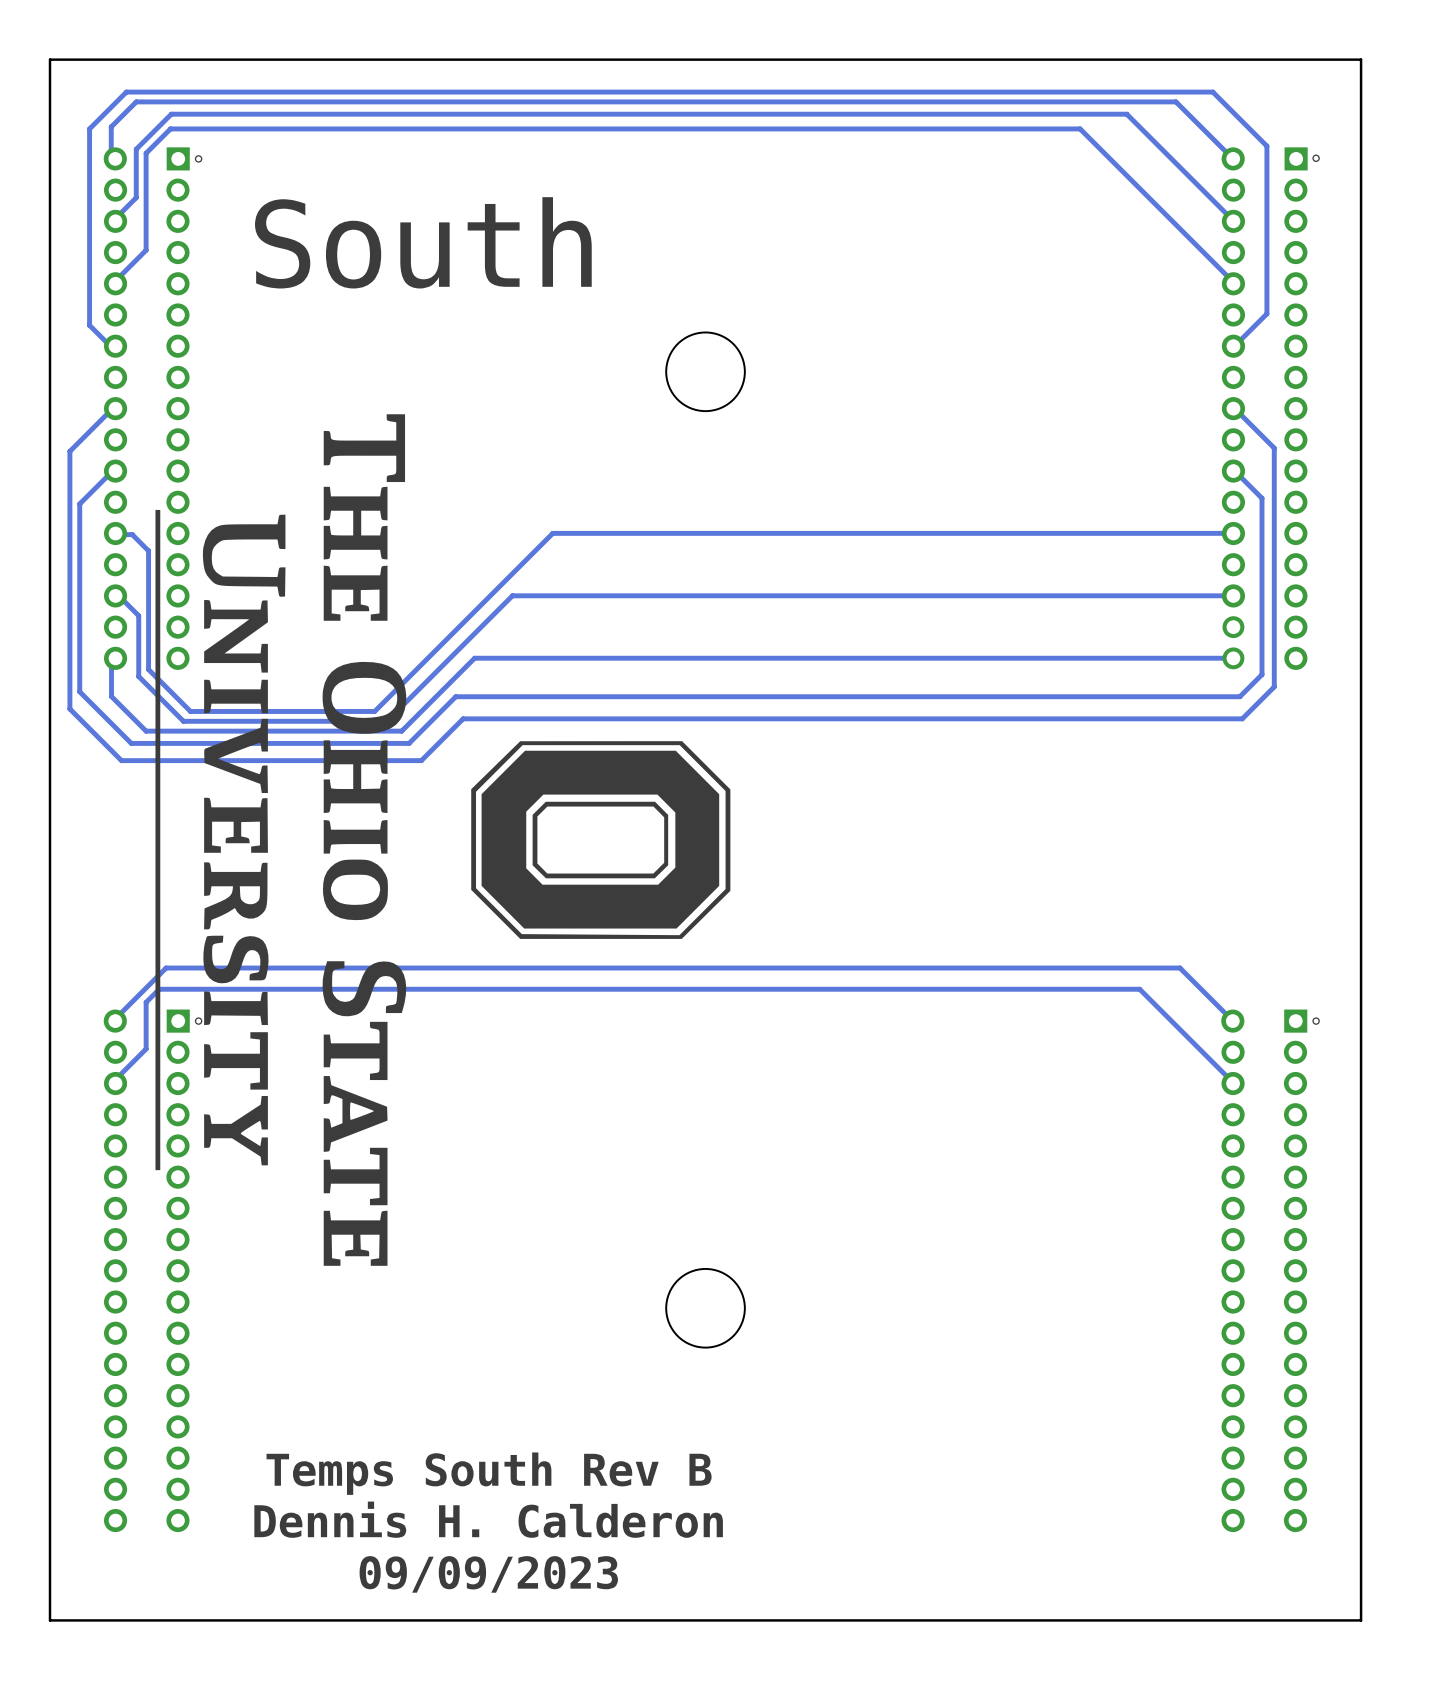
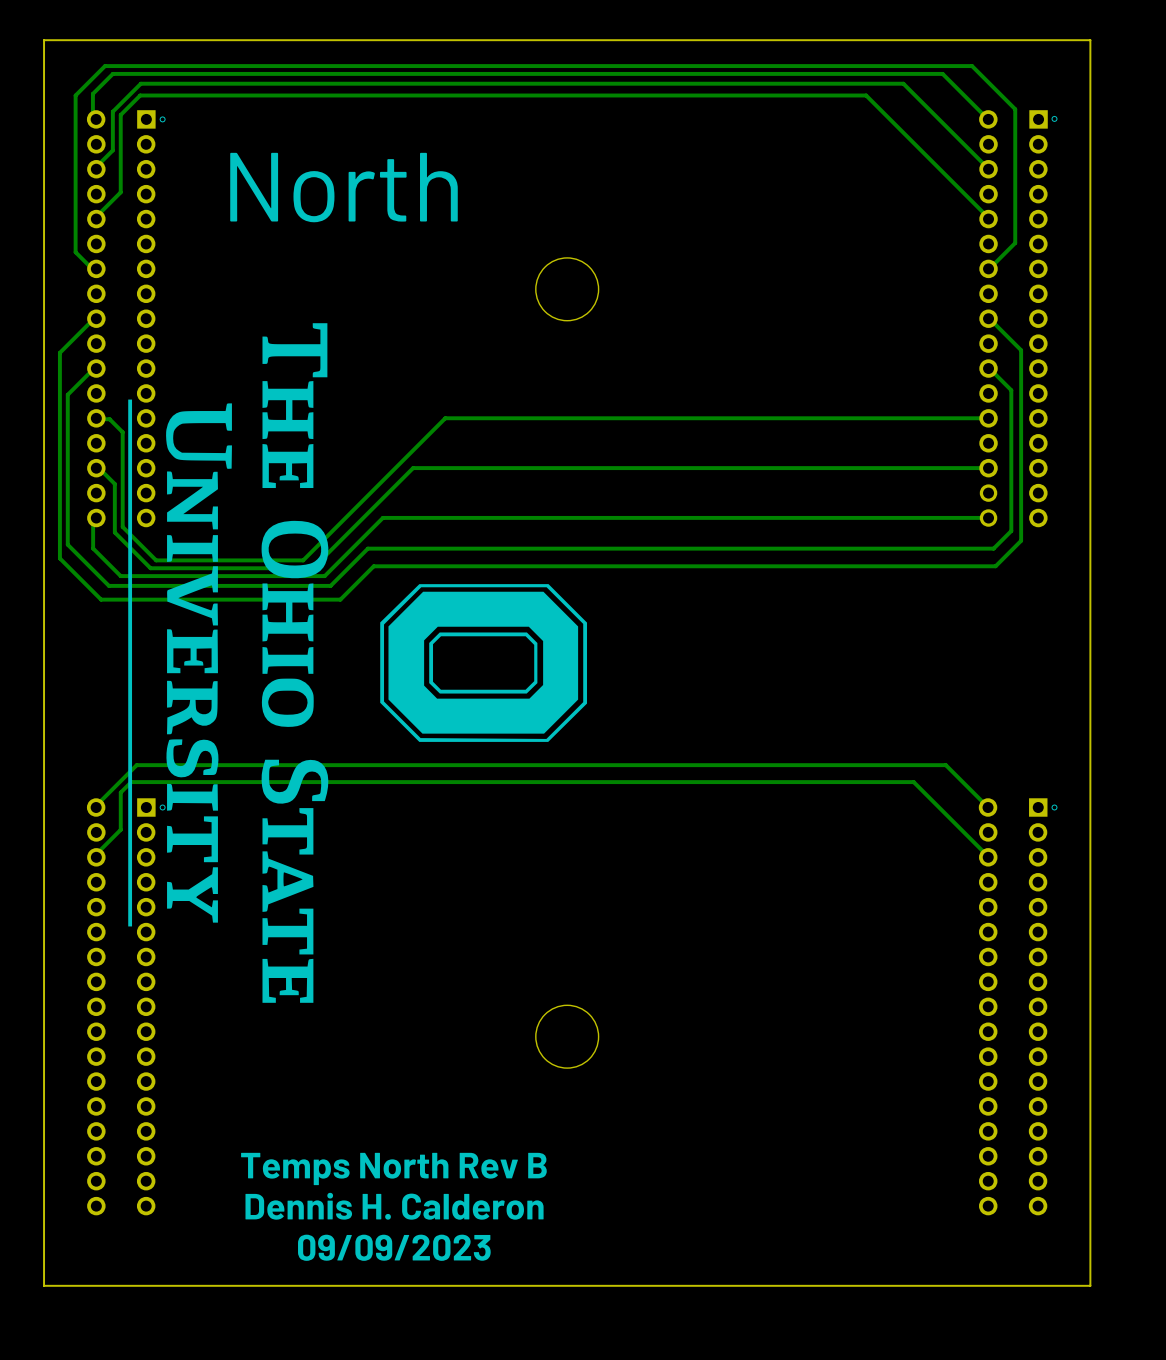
text: South (423, 242) -> North (343, 187)
text: Temps South Rev B (489, 1473) -> Temps North Rev B (393, 1168)

